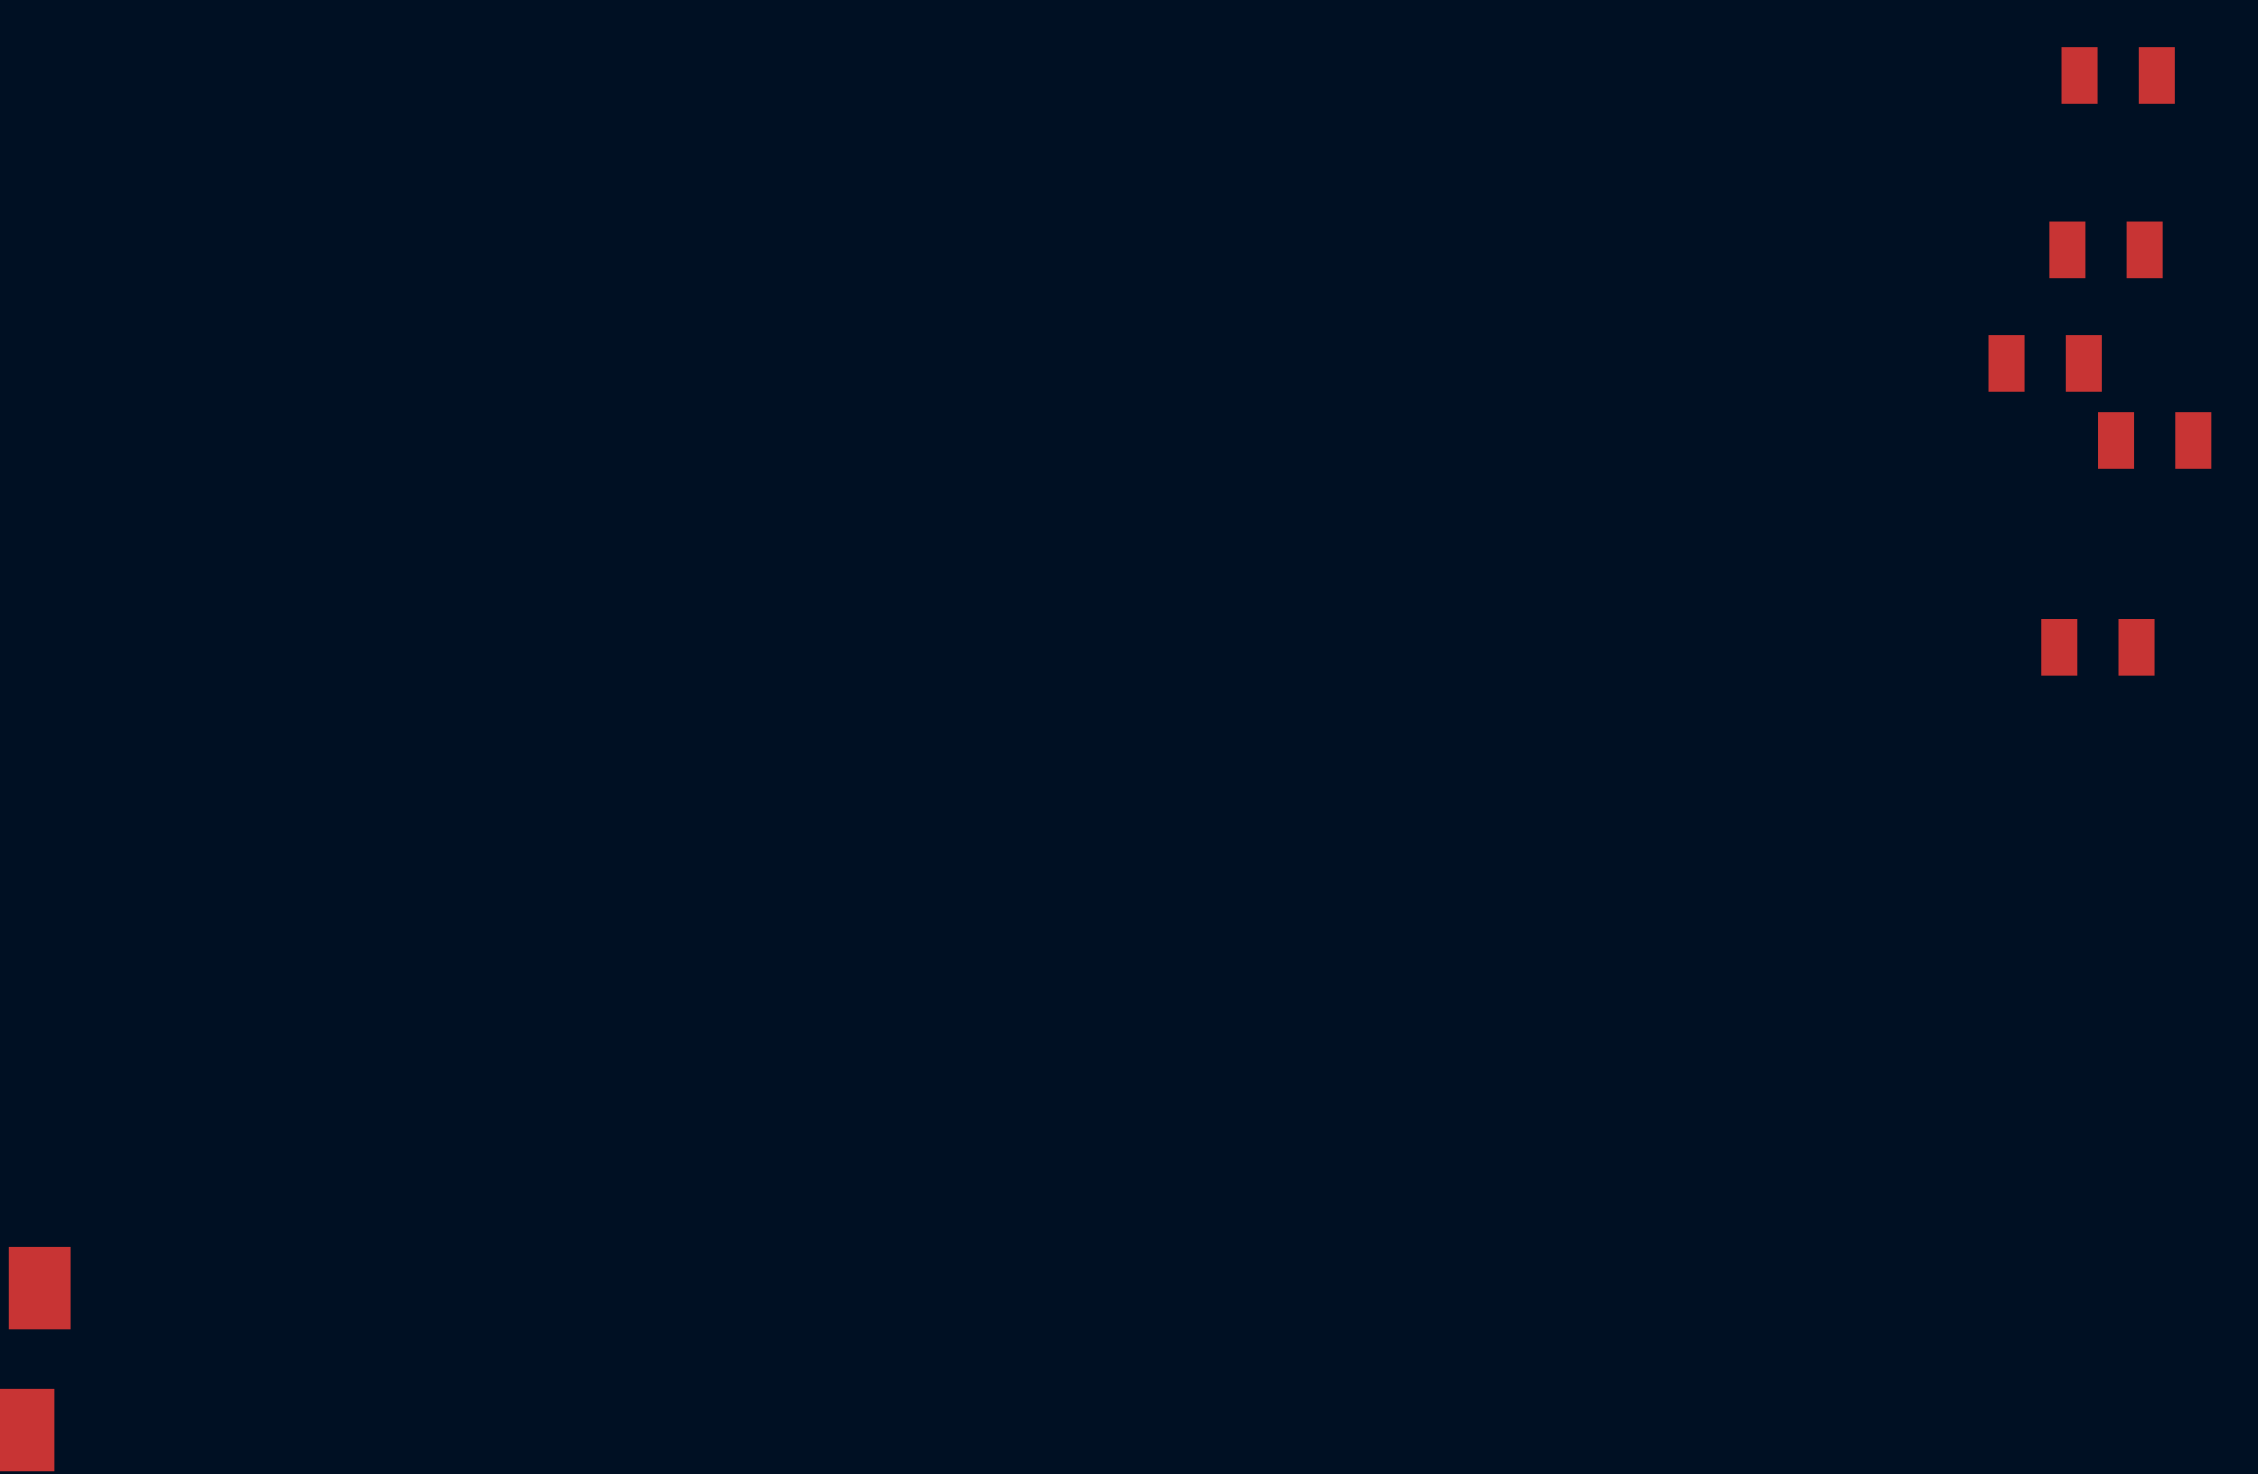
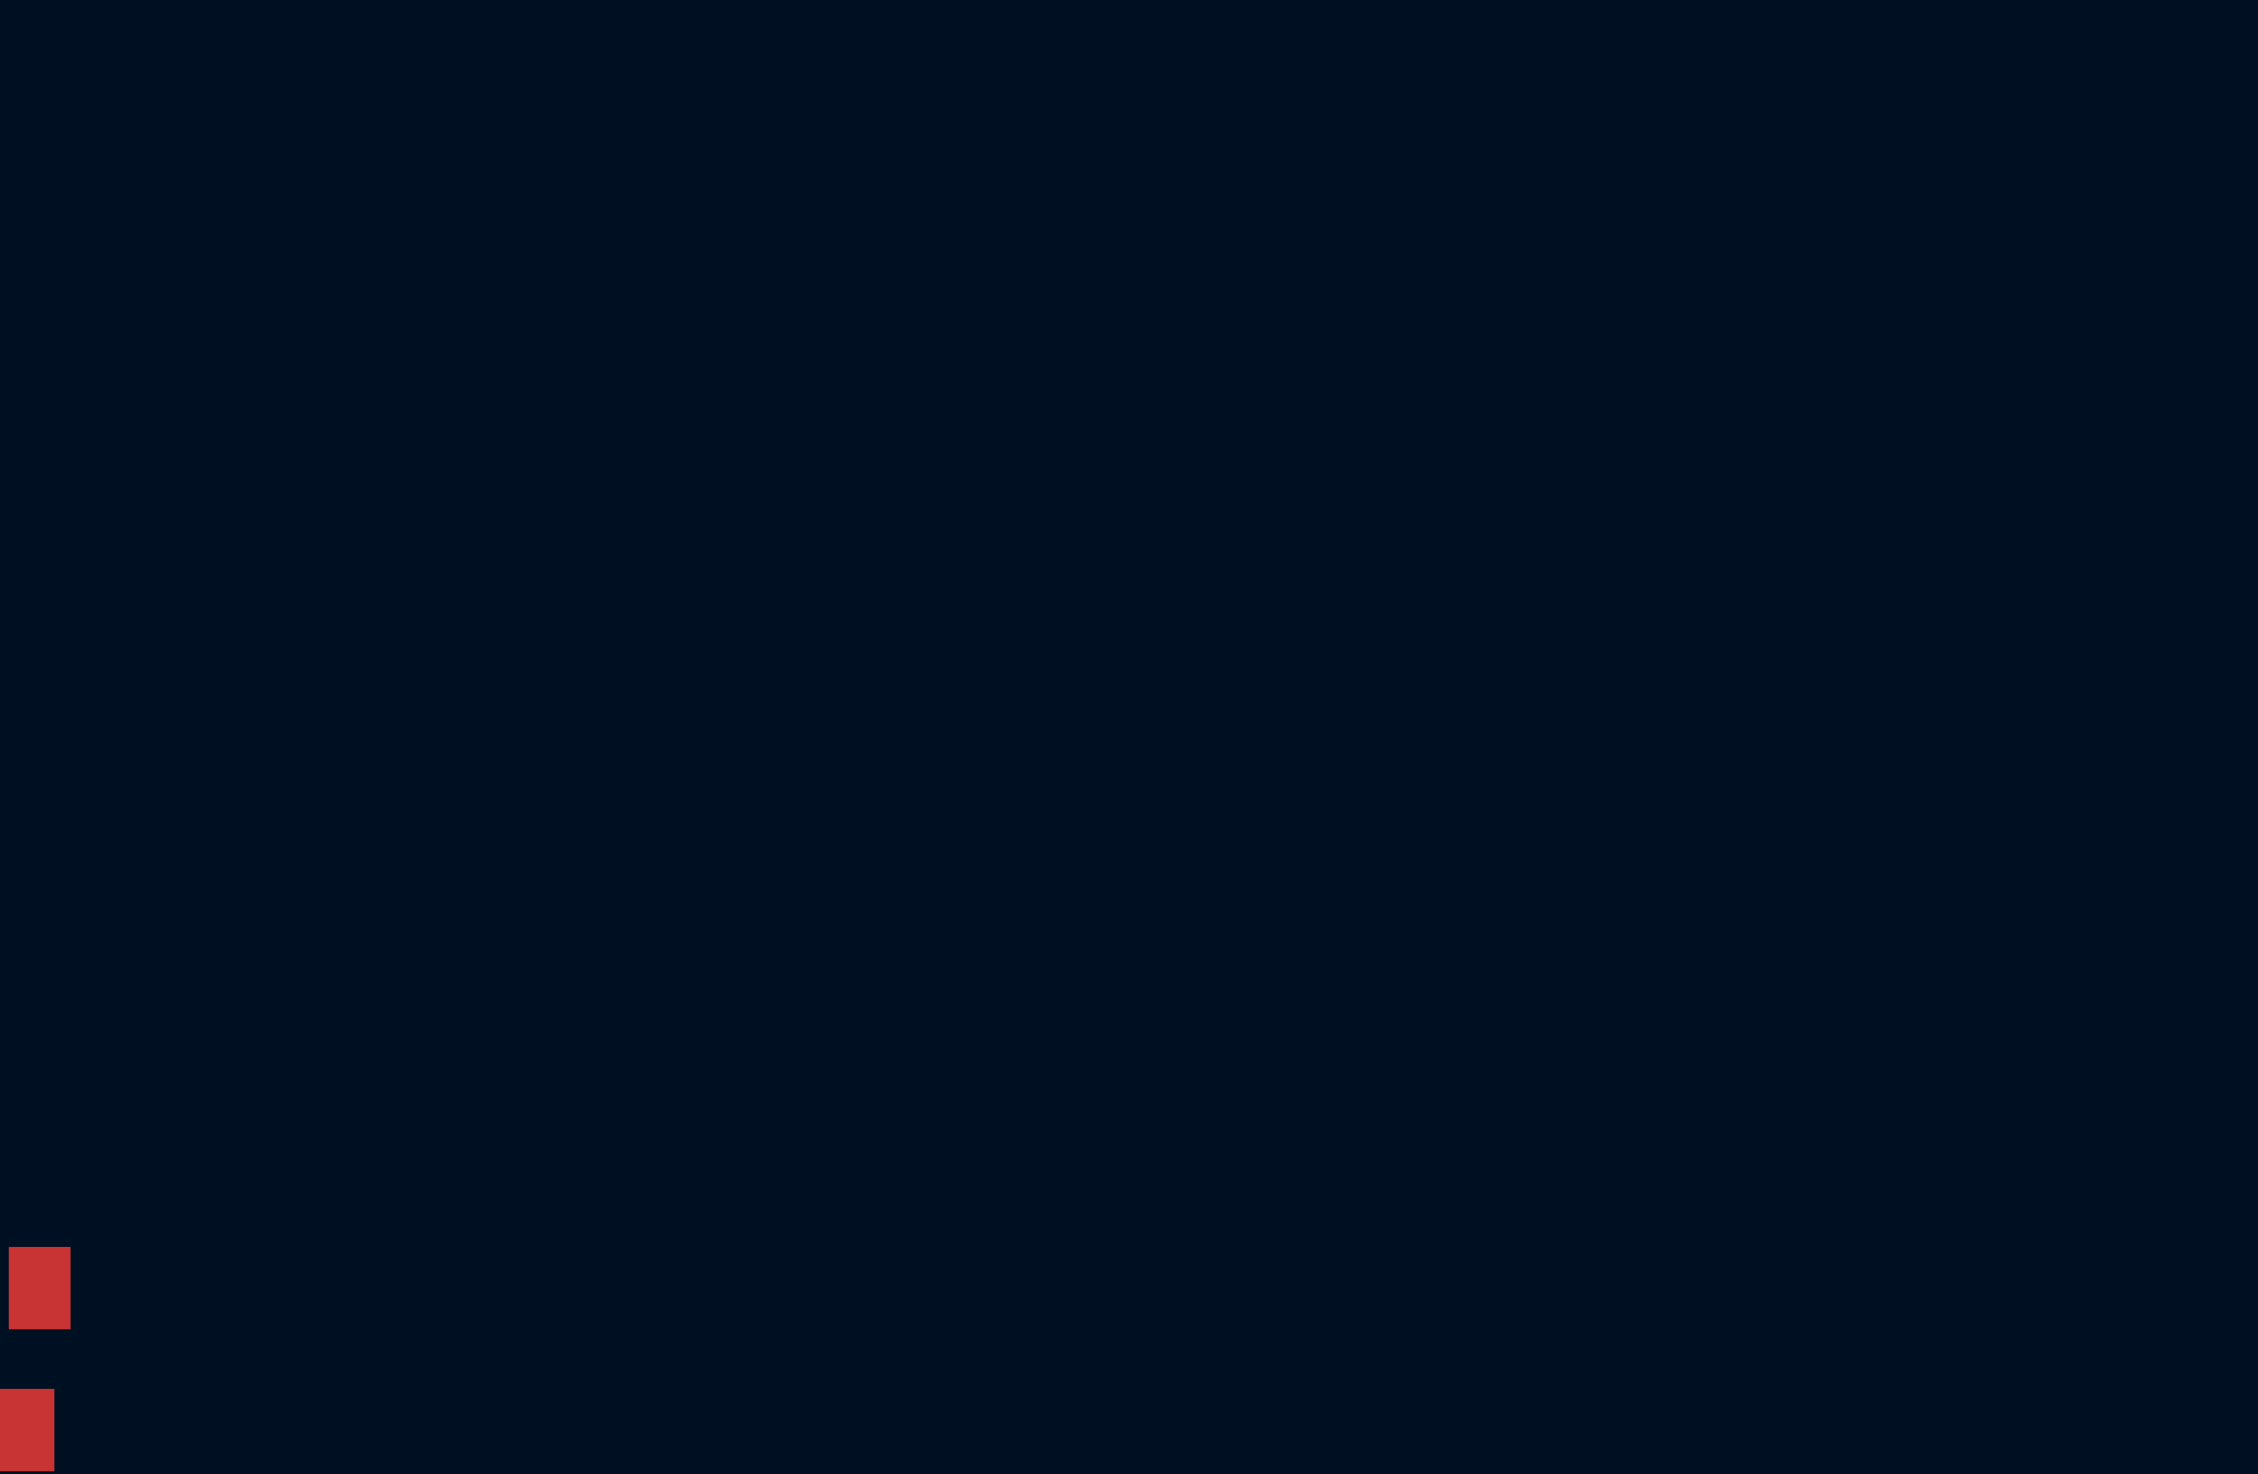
part: (2118, 75) -> none
part: (2106, 249) -> none
part: (2045, 363) -> none
part: (2154, 440) -> none
part: (2097, 647) -> none

